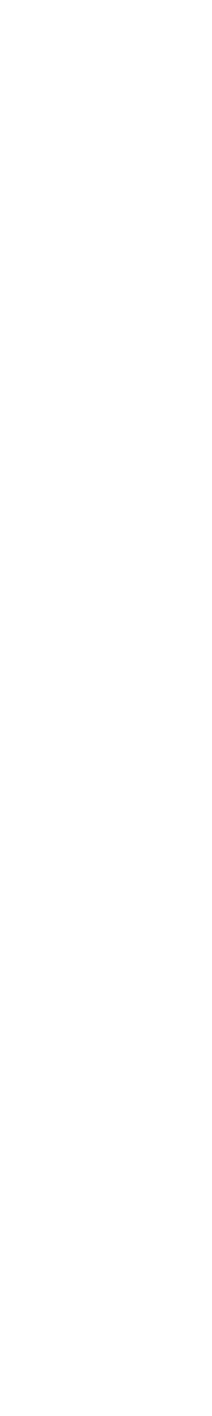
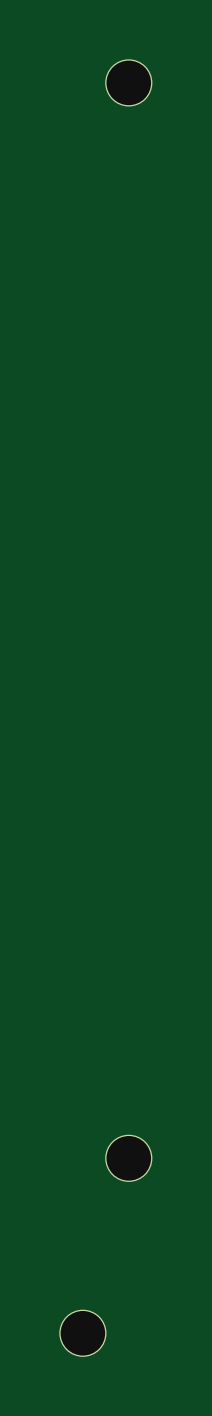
hole: none -> (128, 82)
hole: none -> (128, 1158)
hole: none -> (82, 1333)

